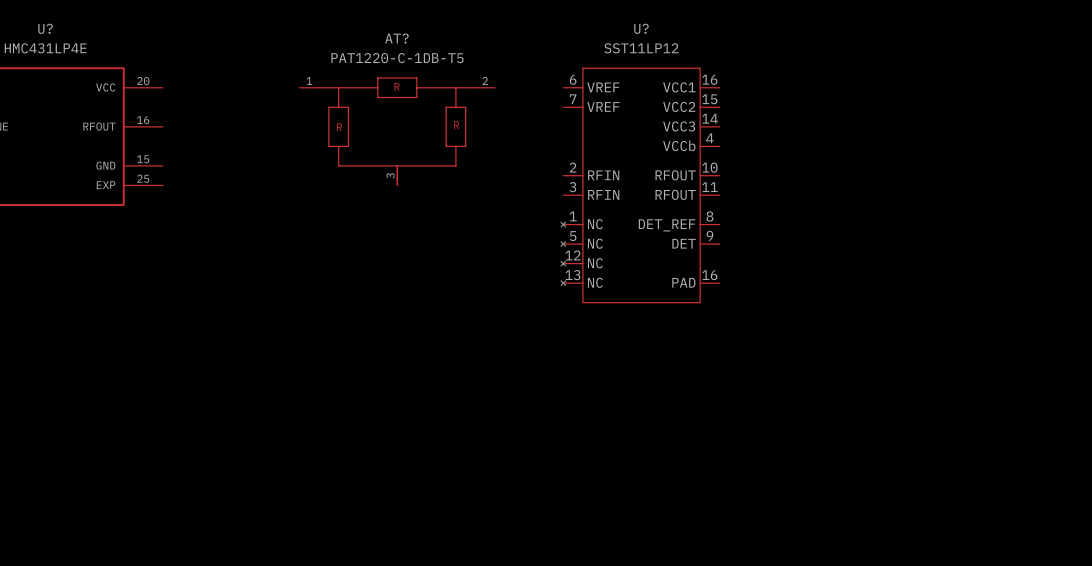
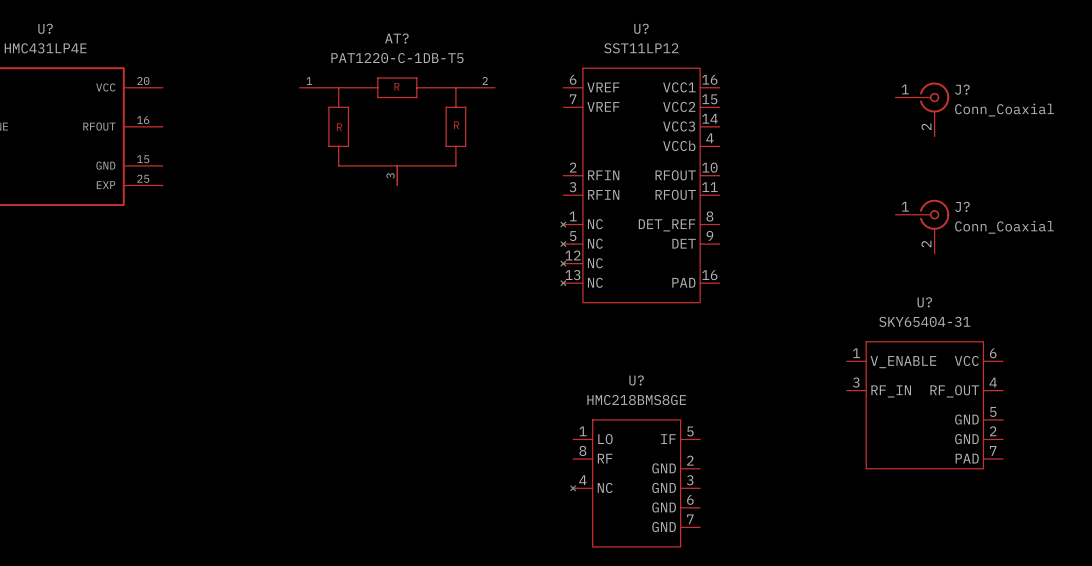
J?: none -> Conn_Coaxial (922, 109)
J?: none -> Conn_Coaxial (922, 226)
U?: none -> SKY65404-31 (924, 405)
U?: none -> HMC218BMS8GE (635, 483)

